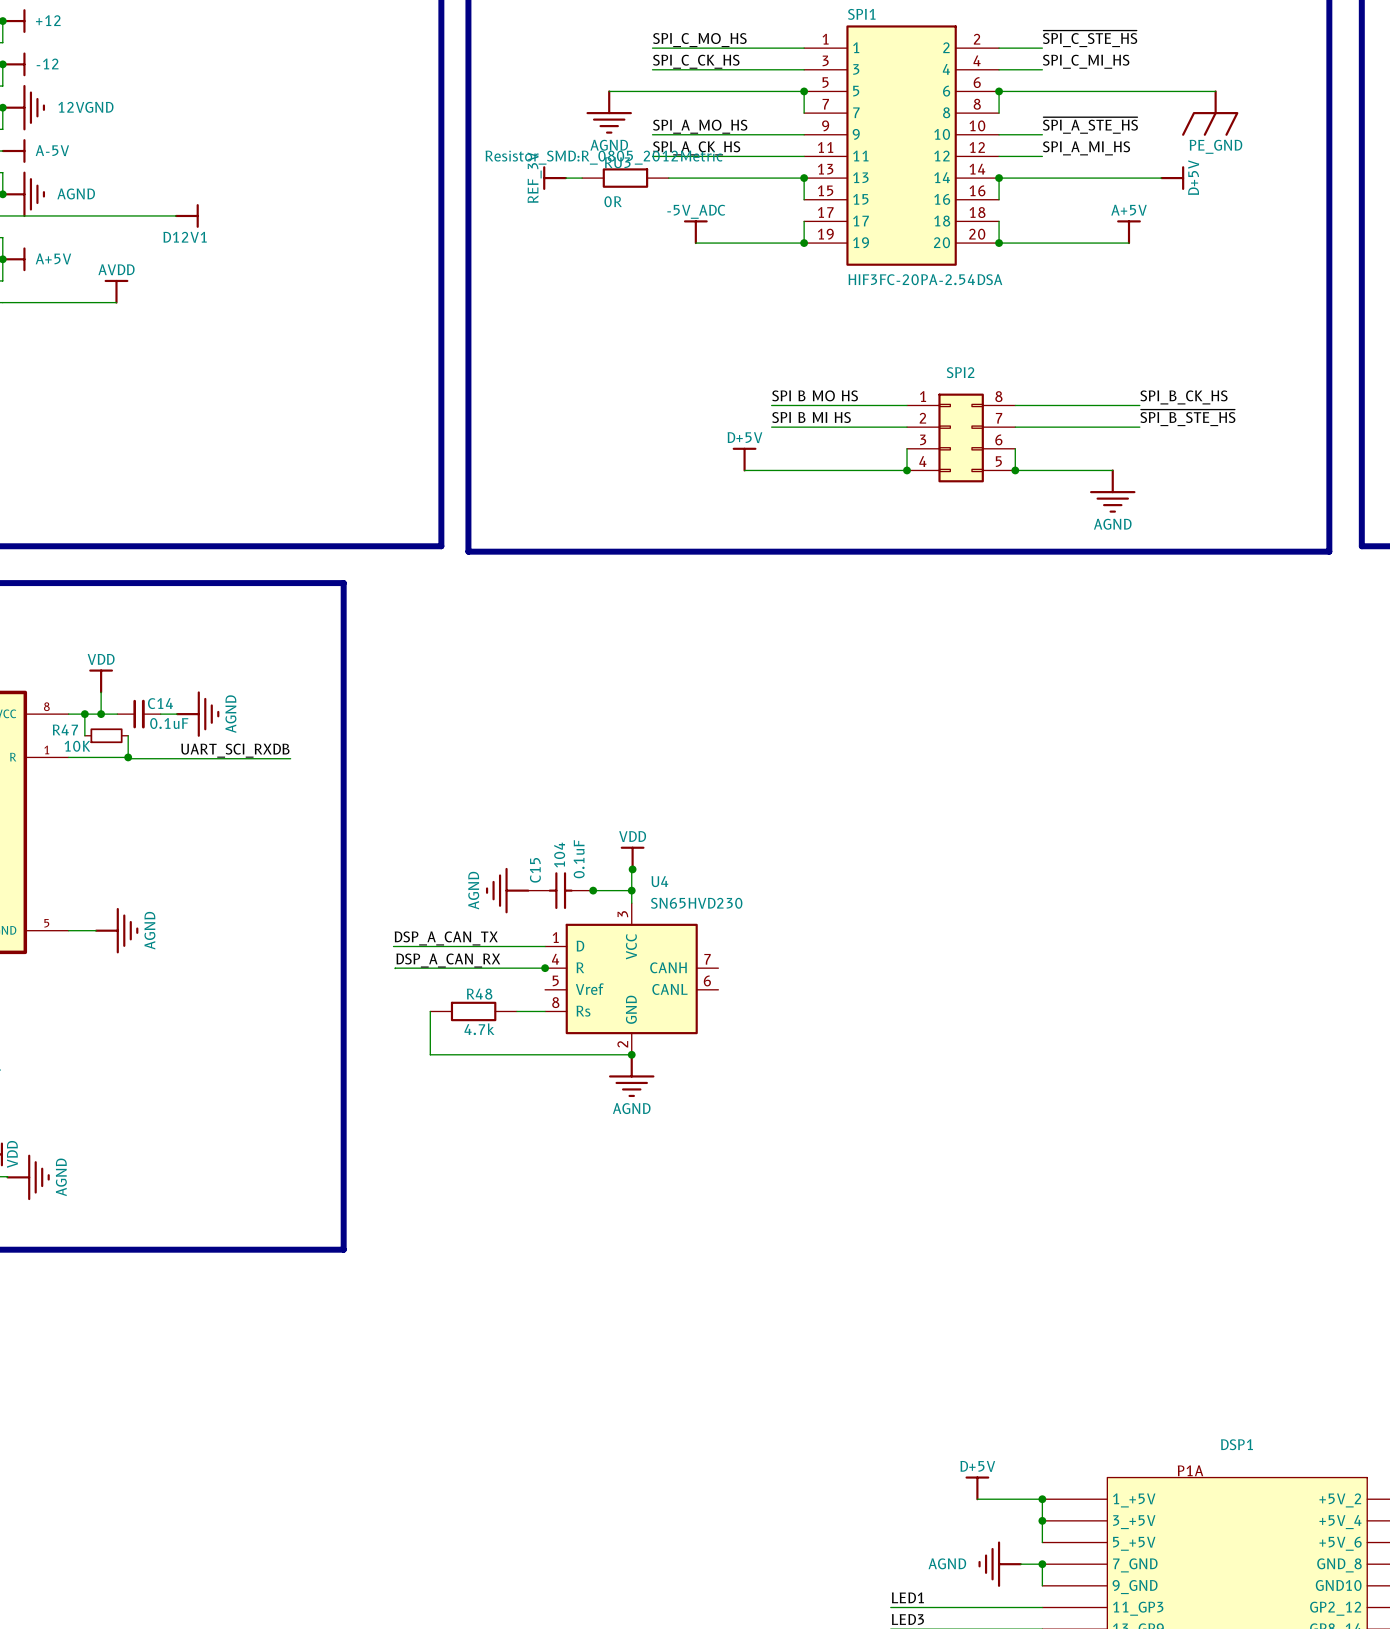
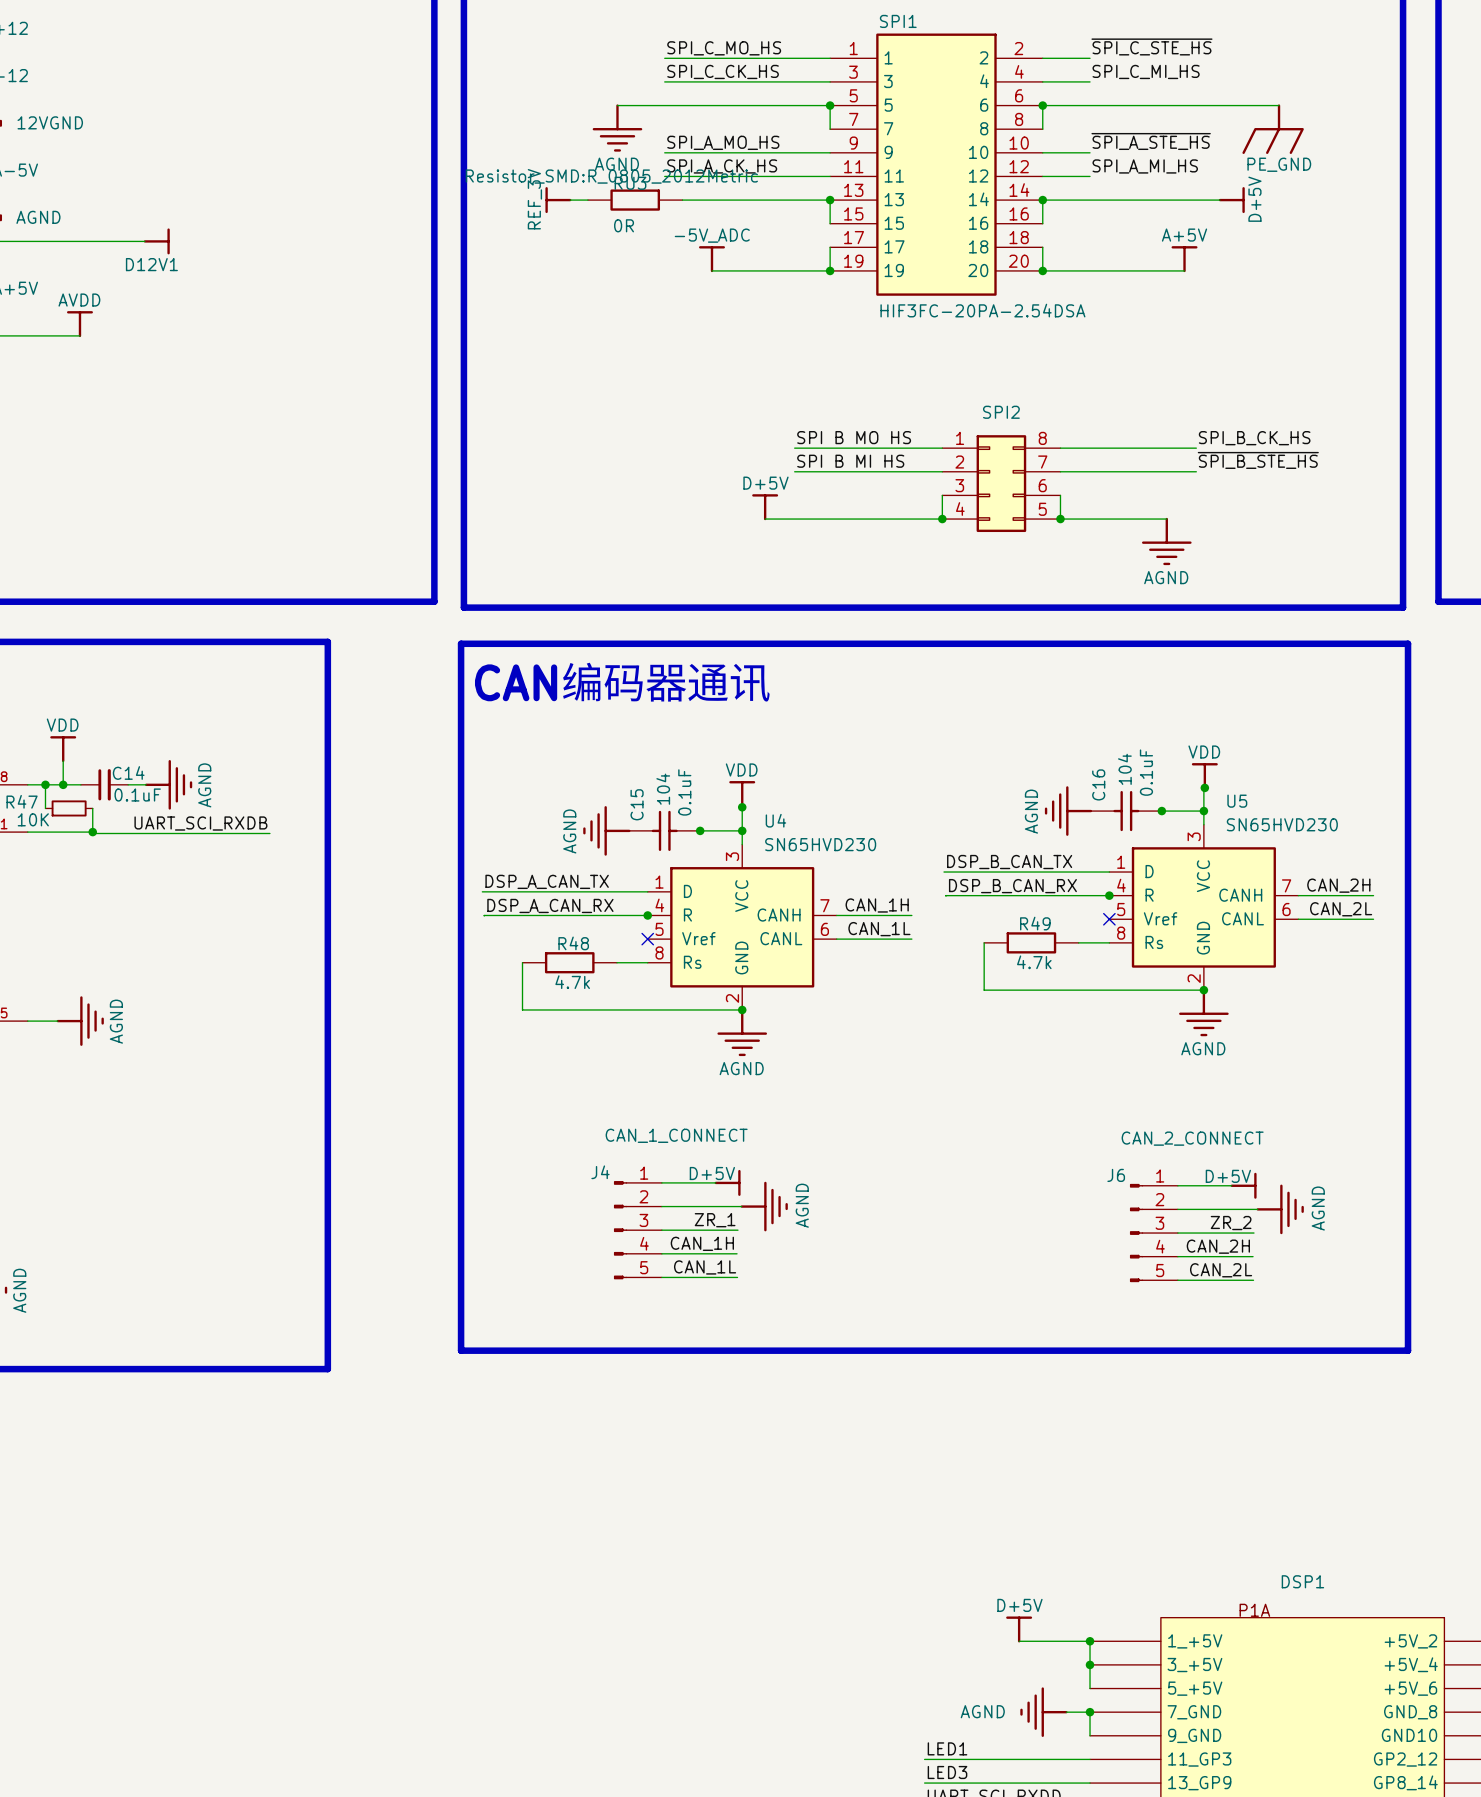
line: none -> (461, 643) (1408, 643) (1408, 1350) (461, 1350) (461, 643)
text: none -> CAN编码器通讯 (623, 682)
power symbol: none -> VDD (1204, 776)
wire: none -> (1204, 787) (1203, 824)
junction: none -> (1204, 787)
wire: none -> (742, 805) (742, 844)
junction: none -> (742, 807)
power symbol: none -> AGND (1068, 811)
C16: none -> 104 (1126, 811)
wire: none -> (1161, 811) (1203, 811)
junction: none -> (1161, 811)
junction: none -> (1203, 811)
power symbol: none -> AGND (606, 830)
junction: none -> (700, 830)
junction: none -> (742, 830)
label: none -> DSP_B_CAN_TX (1009, 862)
wire: none -> (944, 872) (1109, 872)
label: none -> CAN_2H (1338, 885)
label: none -> DSP_B_CAN_RX (1012, 886)
wire: none -> (1110, 895) (945, 896)
junction: none -> (1109, 895)
wire: none -> (1298, 895) (1373, 895)
label: none -> CAN_1H (877, 905)
U5: none -> SN65HVD230 (1203, 907)
label: none -> CAN_2L (1341, 909)
junction: none -> (647, 915)
wire: none -> (836, 915) (911, 915)
no-connect mark: none -> (1109, 919)
wire: none -> (1298, 919) (1373, 919)
label: none -> CAN_1L (879, 929)
no-connect mark: none -> (647, 939)
wire: none -> (836, 939) (911, 939)
power symbol position: VDD (632, 858) -> VDD (742, 794)
wire: none -> (984, 942) (984, 990) (1203, 990)
R49: none -> 4.7k (1031, 942)
wire: none -> (1078, 942) (1109, 942)
wire: (632, 868) (631, 903) -> none
junction: (632, 869) -> none
power symbol: AGND (507, 890) -> none
C15 position: (560, 890) -> (664, 830)
wire: (592, 890) (631, 890) -> (699, 830) (742, 830)
junction: (593, 890) -> none
junction: (631, 890) -> none
junction: none -> (1203, 990)
junction: none -> (742, 1009)
power symbol: none -> AGND (1203, 1012)
label position: DSP_A_CAN_TX (446, 938) -> DSP_A_CAN_TX (547, 881)
power symbol: none -> AGND (742, 1032)
wire: (393, 946) (545, 946) -> (482, 891) (647, 891)
label position: DSP_A_CAN_RX (448, 960) -> DSP_A_CAN_RX (550, 905)
wire: (545, 968) (395, 968) -> (648, 915) (484, 915)
junction: (545, 968) -> none
U4 position: (631, 978) -> (742, 927)
wire: (430, 1011) (430, 1054) (631, 1054) -> (522, 962) (522, 1009) (742, 1009)
R48 position: (473, 1011) -> (569, 962)
wire: (516, 1011) (545, 1011) -> (617, 962) (647, 962)
junction: (631, 1054) -> none
power symbol: AGND (631, 1075) -> none
wire: none -> (661, 1182) (715, 1182)
power symbol: none -> D+5V (727, 1182)
wire: none -> (1177, 1185) (1231, 1185)
power symbol: none -> D+5V (1243, 1185)
wire: none -> (661, 1206) (741, 1206)
power symbol: none -> AGND (764, 1206)
wire: none -> (1177, 1209) (1257, 1209)
power symbol: none -> AGND (1280, 1209)
label: none -> ZR_1 (715, 1220)
label: none -> ZR_2 (1231, 1223)
J4: none -> CAN_1_CONNECT (637, 1230)
wire: none -> (661, 1230) (737, 1230)
J6: none -> CAN_2_CONNECT (1153, 1233)
wire: none -> (1177, 1233) (1253, 1233)
label: none -> CAN_1H (702, 1243)
label: none -> CAN_2H (1218, 1246)
wire: none -> (661, 1253) (737, 1253)
wire: none -> (1177, 1256) (1253, 1256)
label: none -> CAN_1L (705, 1267)
label: none -> CAN_2L (1221, 1270)
wire: none -> (661, 1277) (737, 1277)
wire: none -> (1177, 1280) (1253, 1280)

